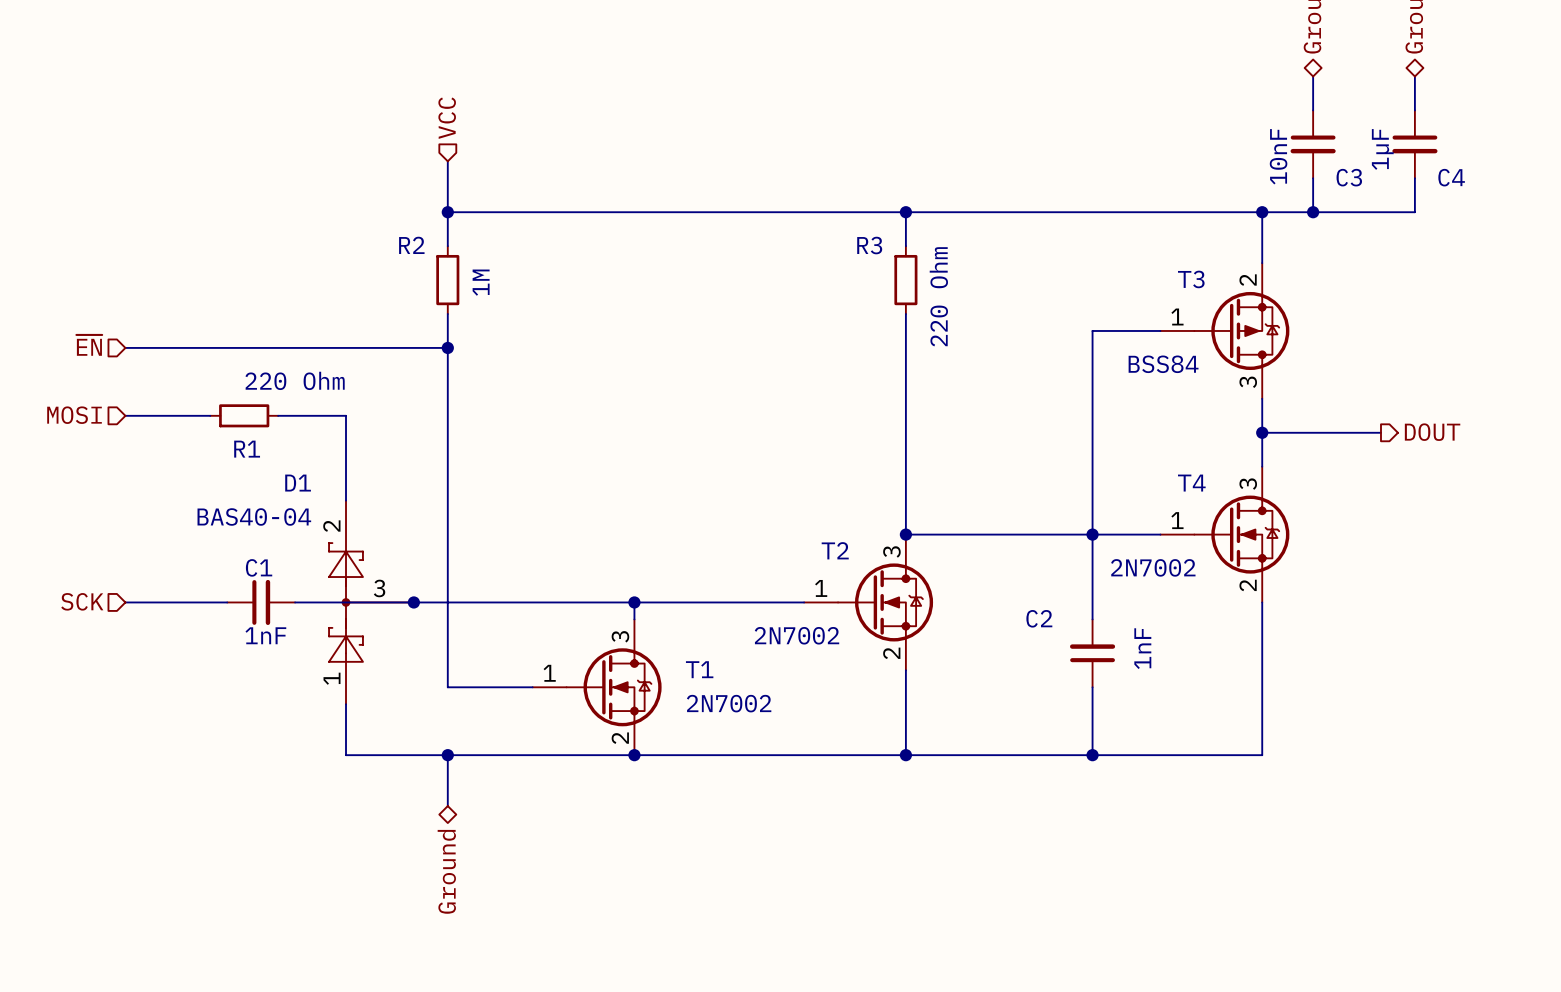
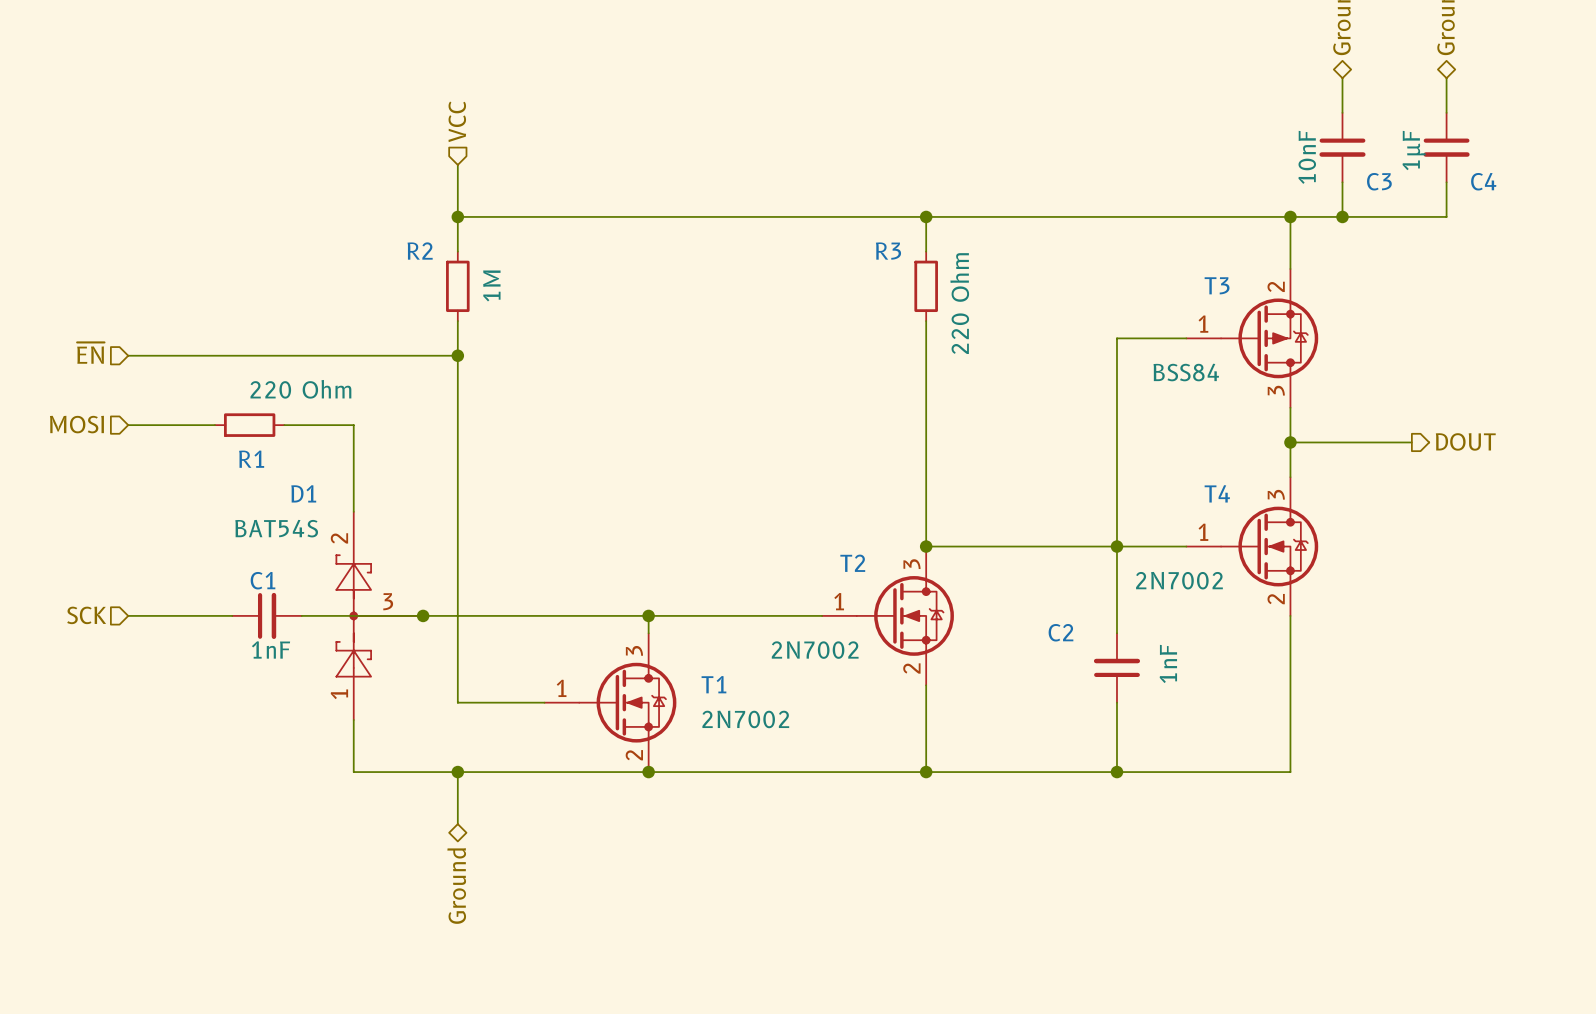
D1 value: BAS40-04 (254, 516) -> BAT54S (276, 528)

